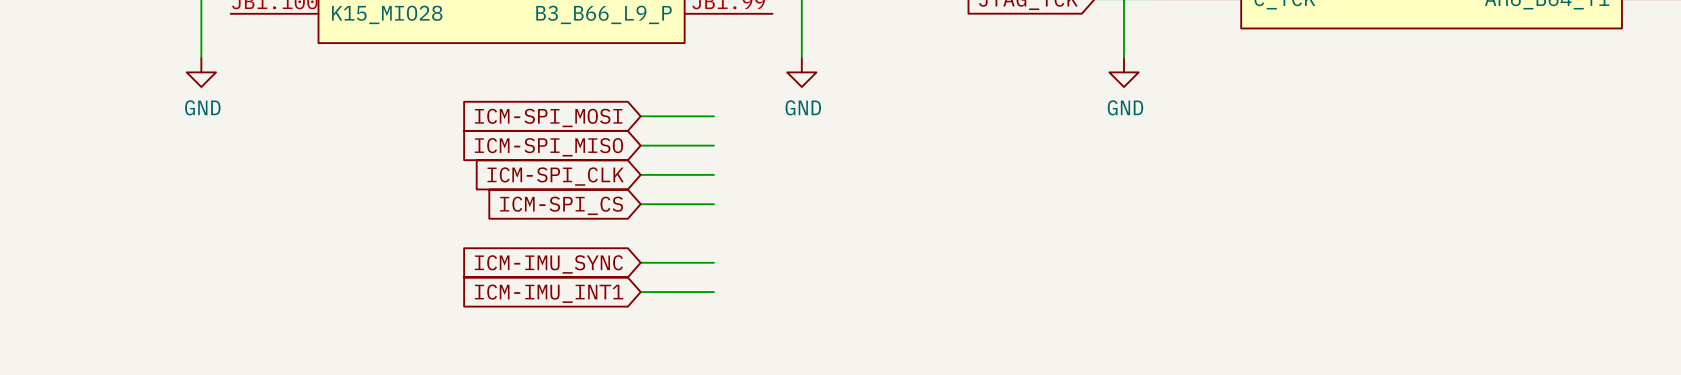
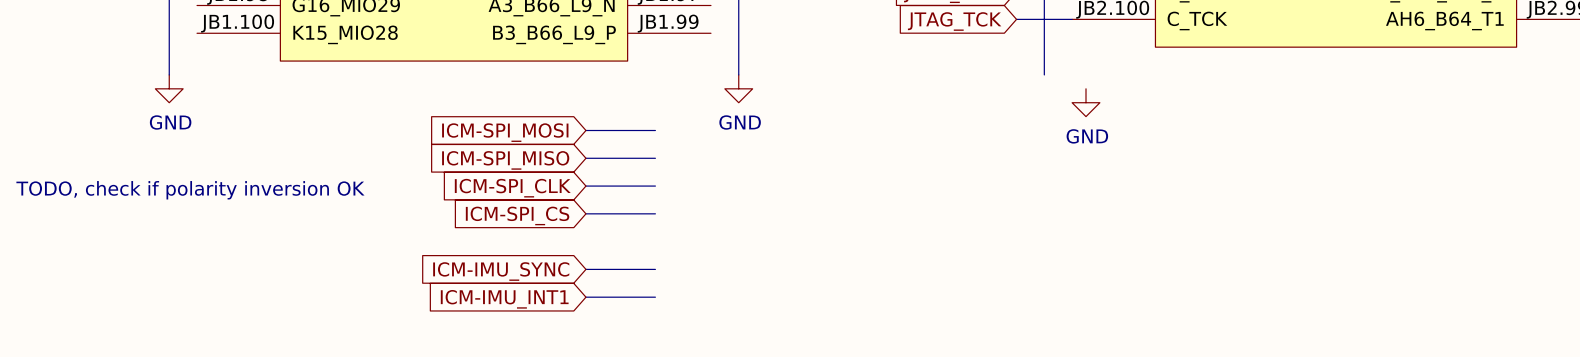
power symbol position: GND (1124, 72) -> GND (1086, 102)
text: none -> TODO, check if polarity inversion OK (190, 190)

